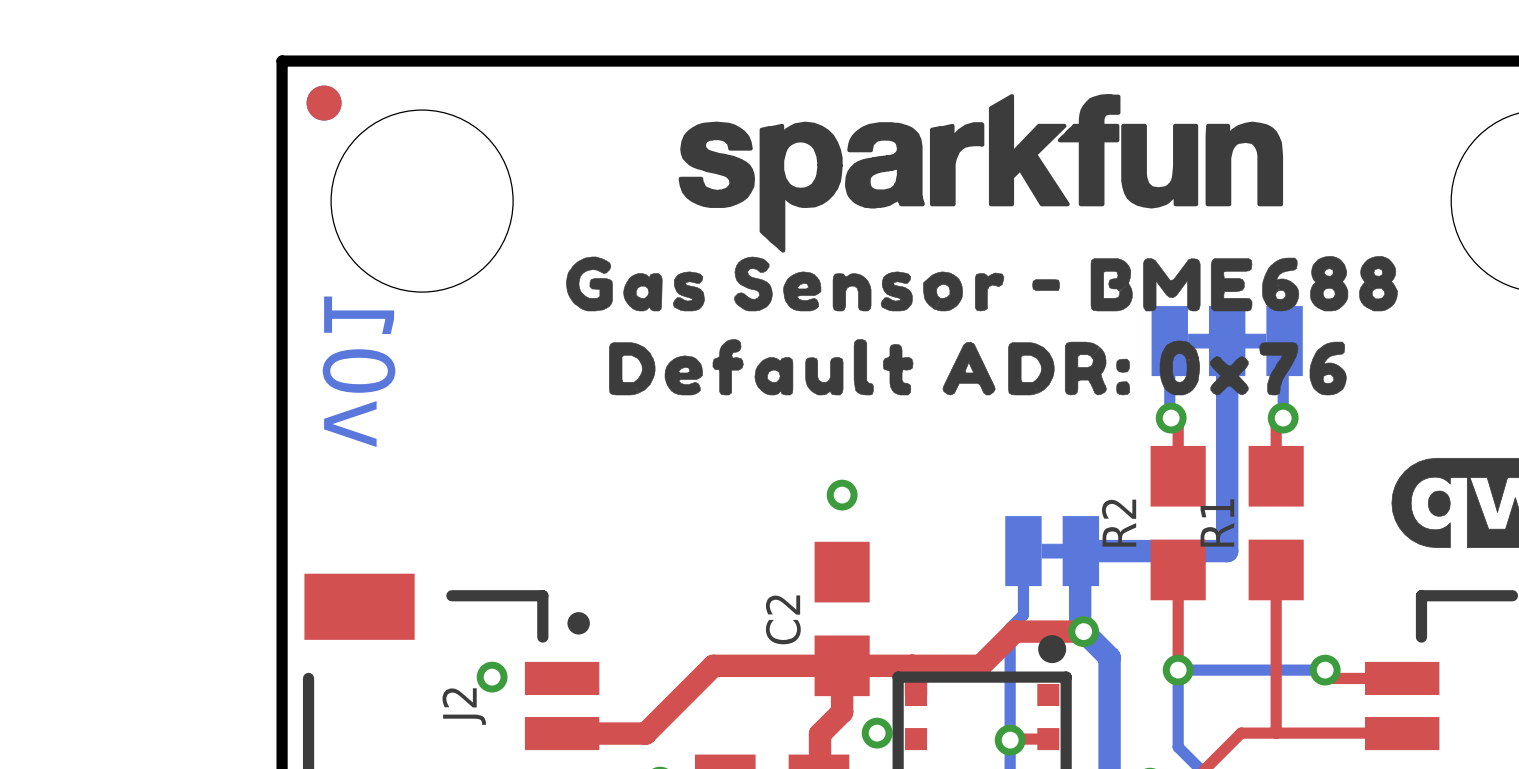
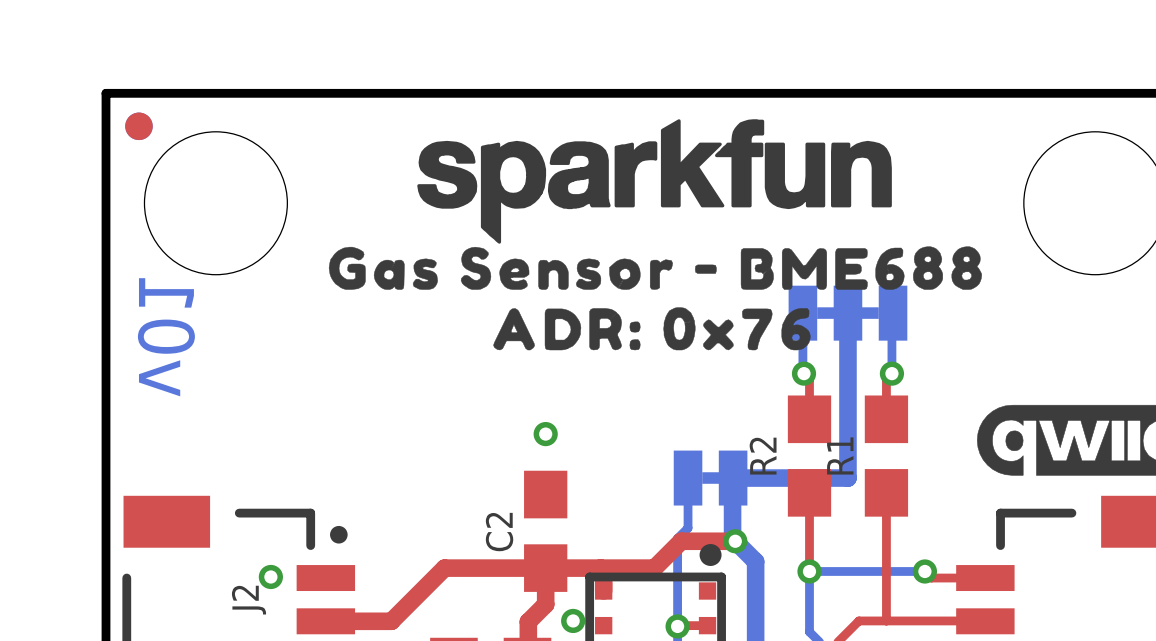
drawing shape: [609, 339, 1347, 396] -> [493, 307, 811, 351]

